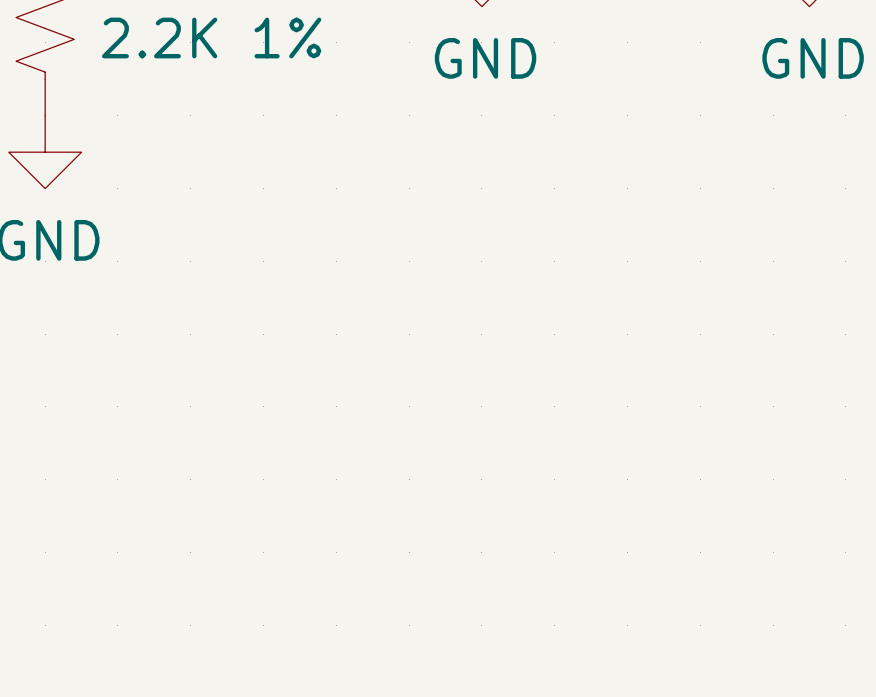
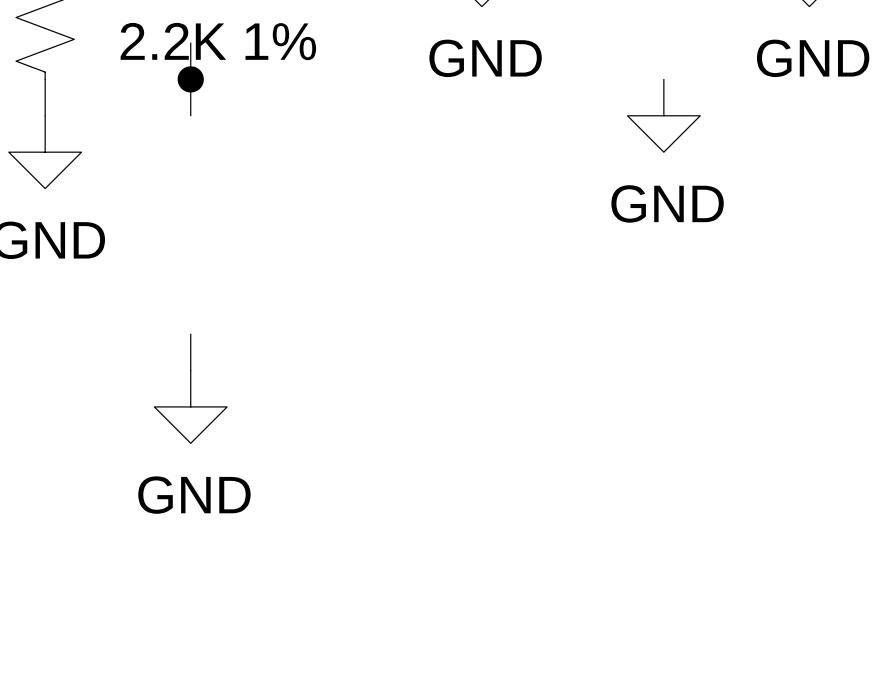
part value position: 2.2K 1% (211, 38) -> 2.2K 1% (218, 41)
wire: none -> (190, 42) (190, 115)
junction: none -> (190, 79)
power symbol: none -> GND (663, 115)
wire: none -> (190, 334) (190, 370)
power symbol: none -> GND (190, 406)

